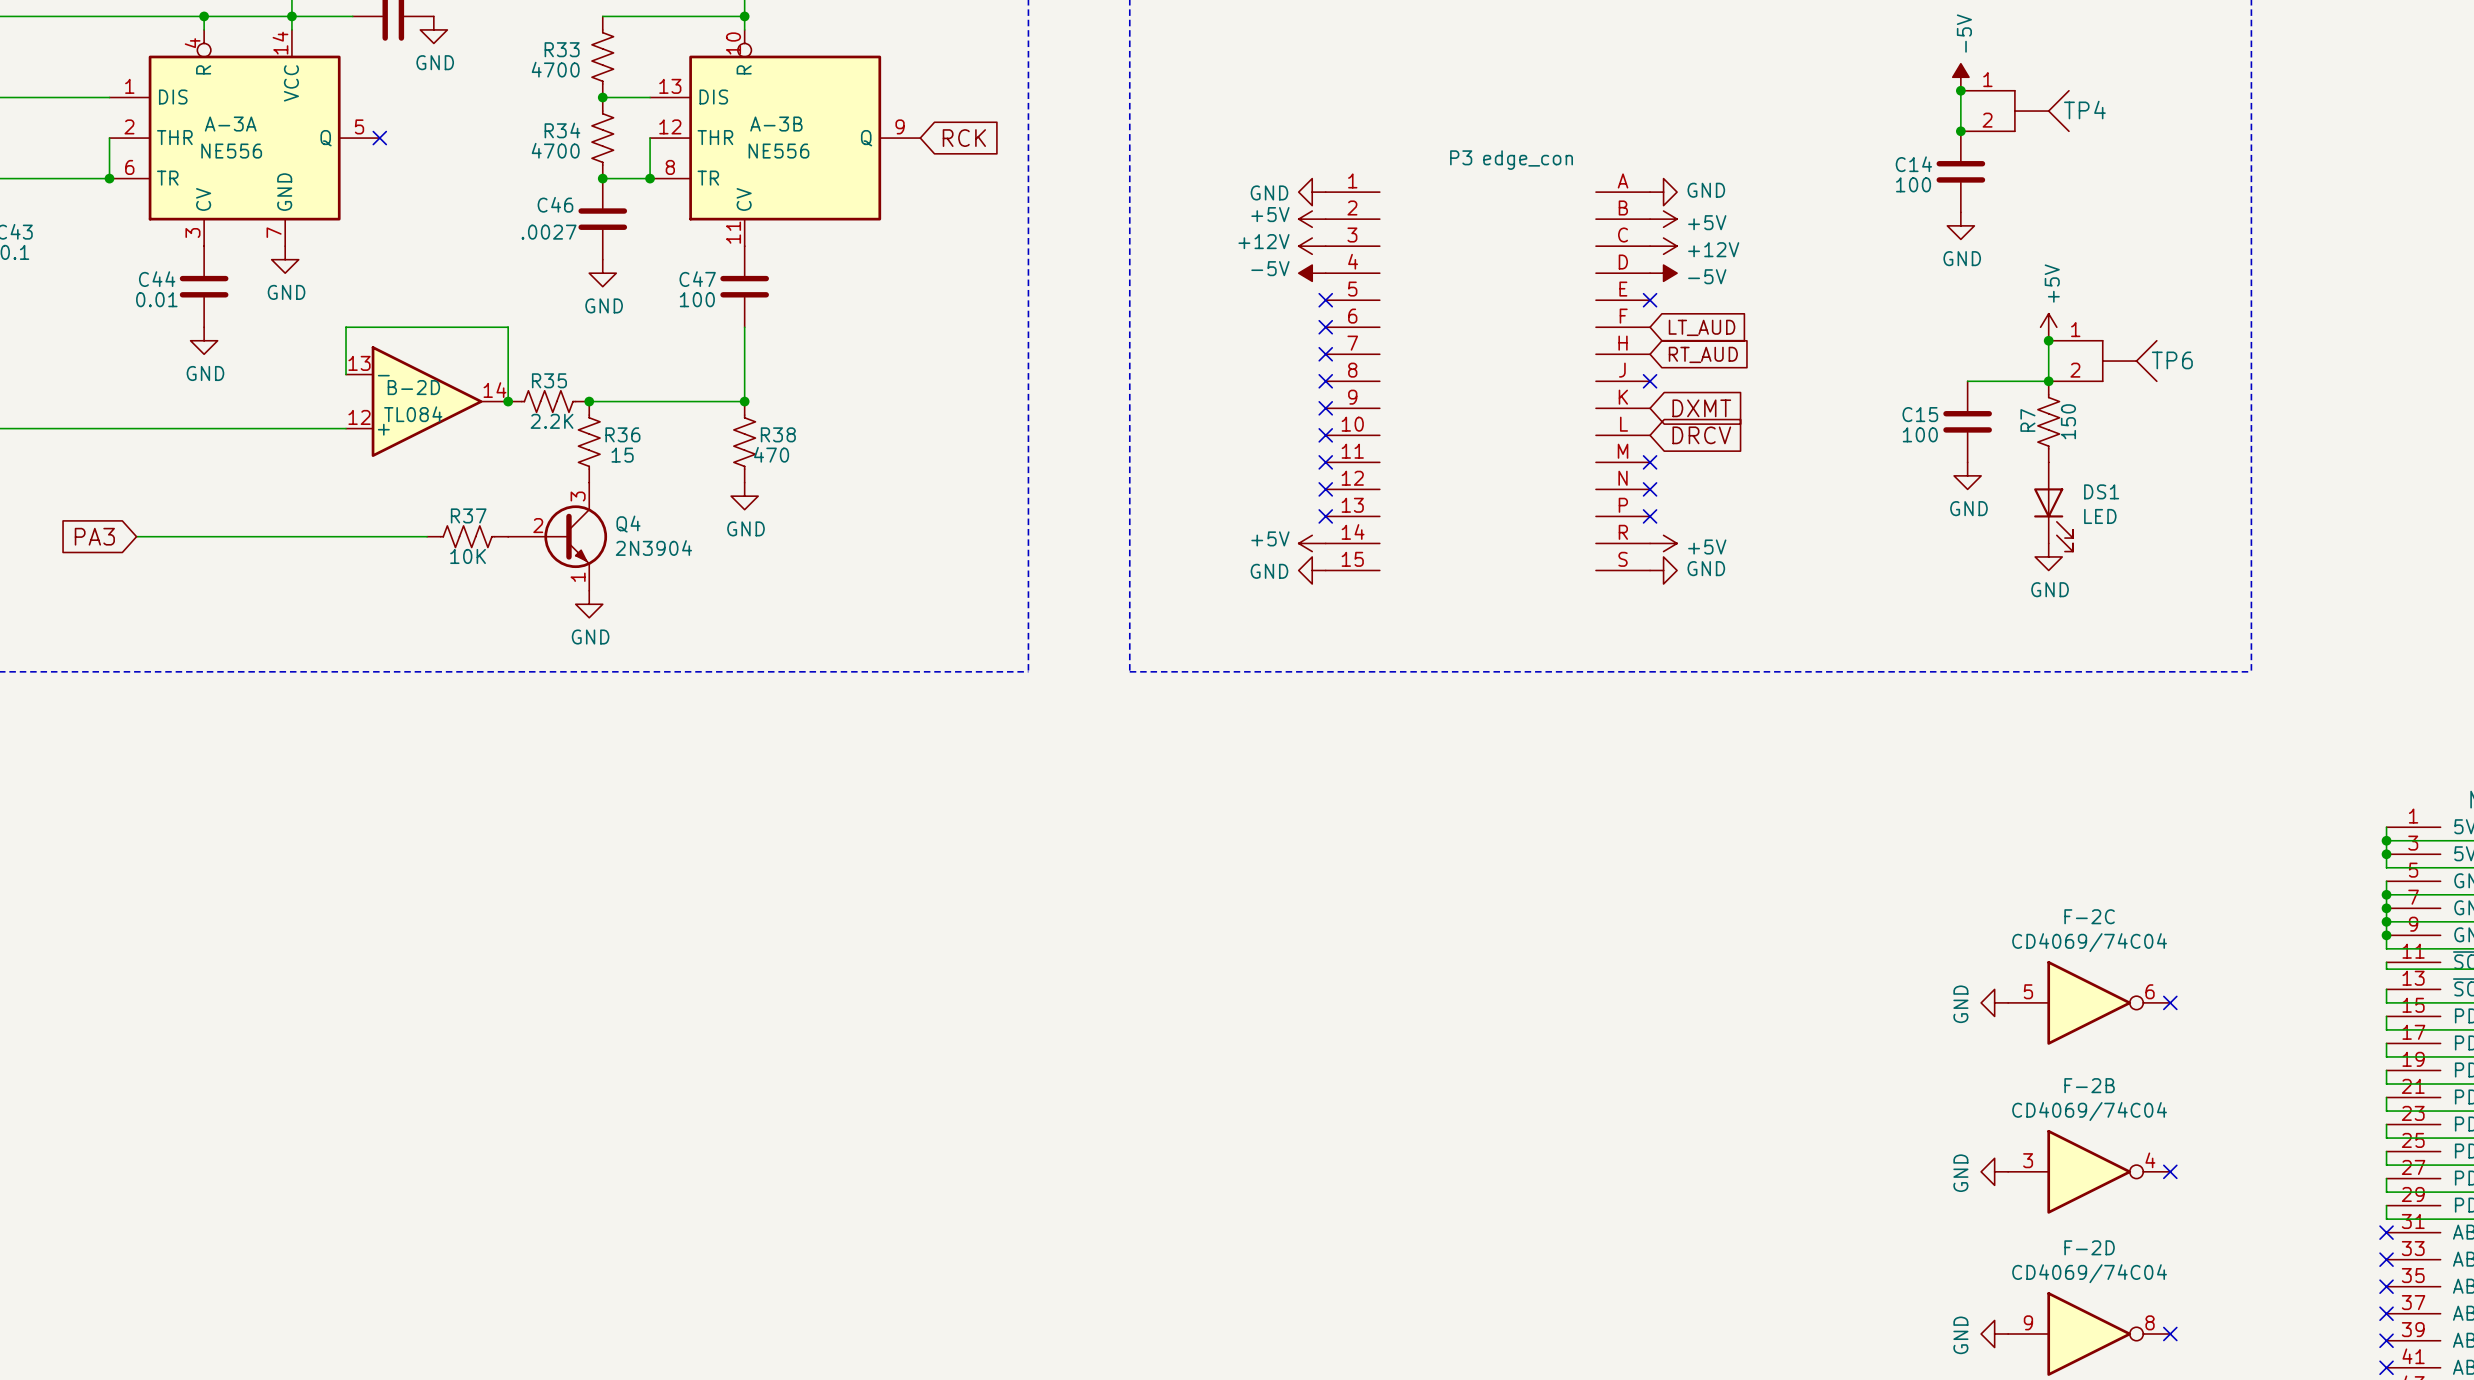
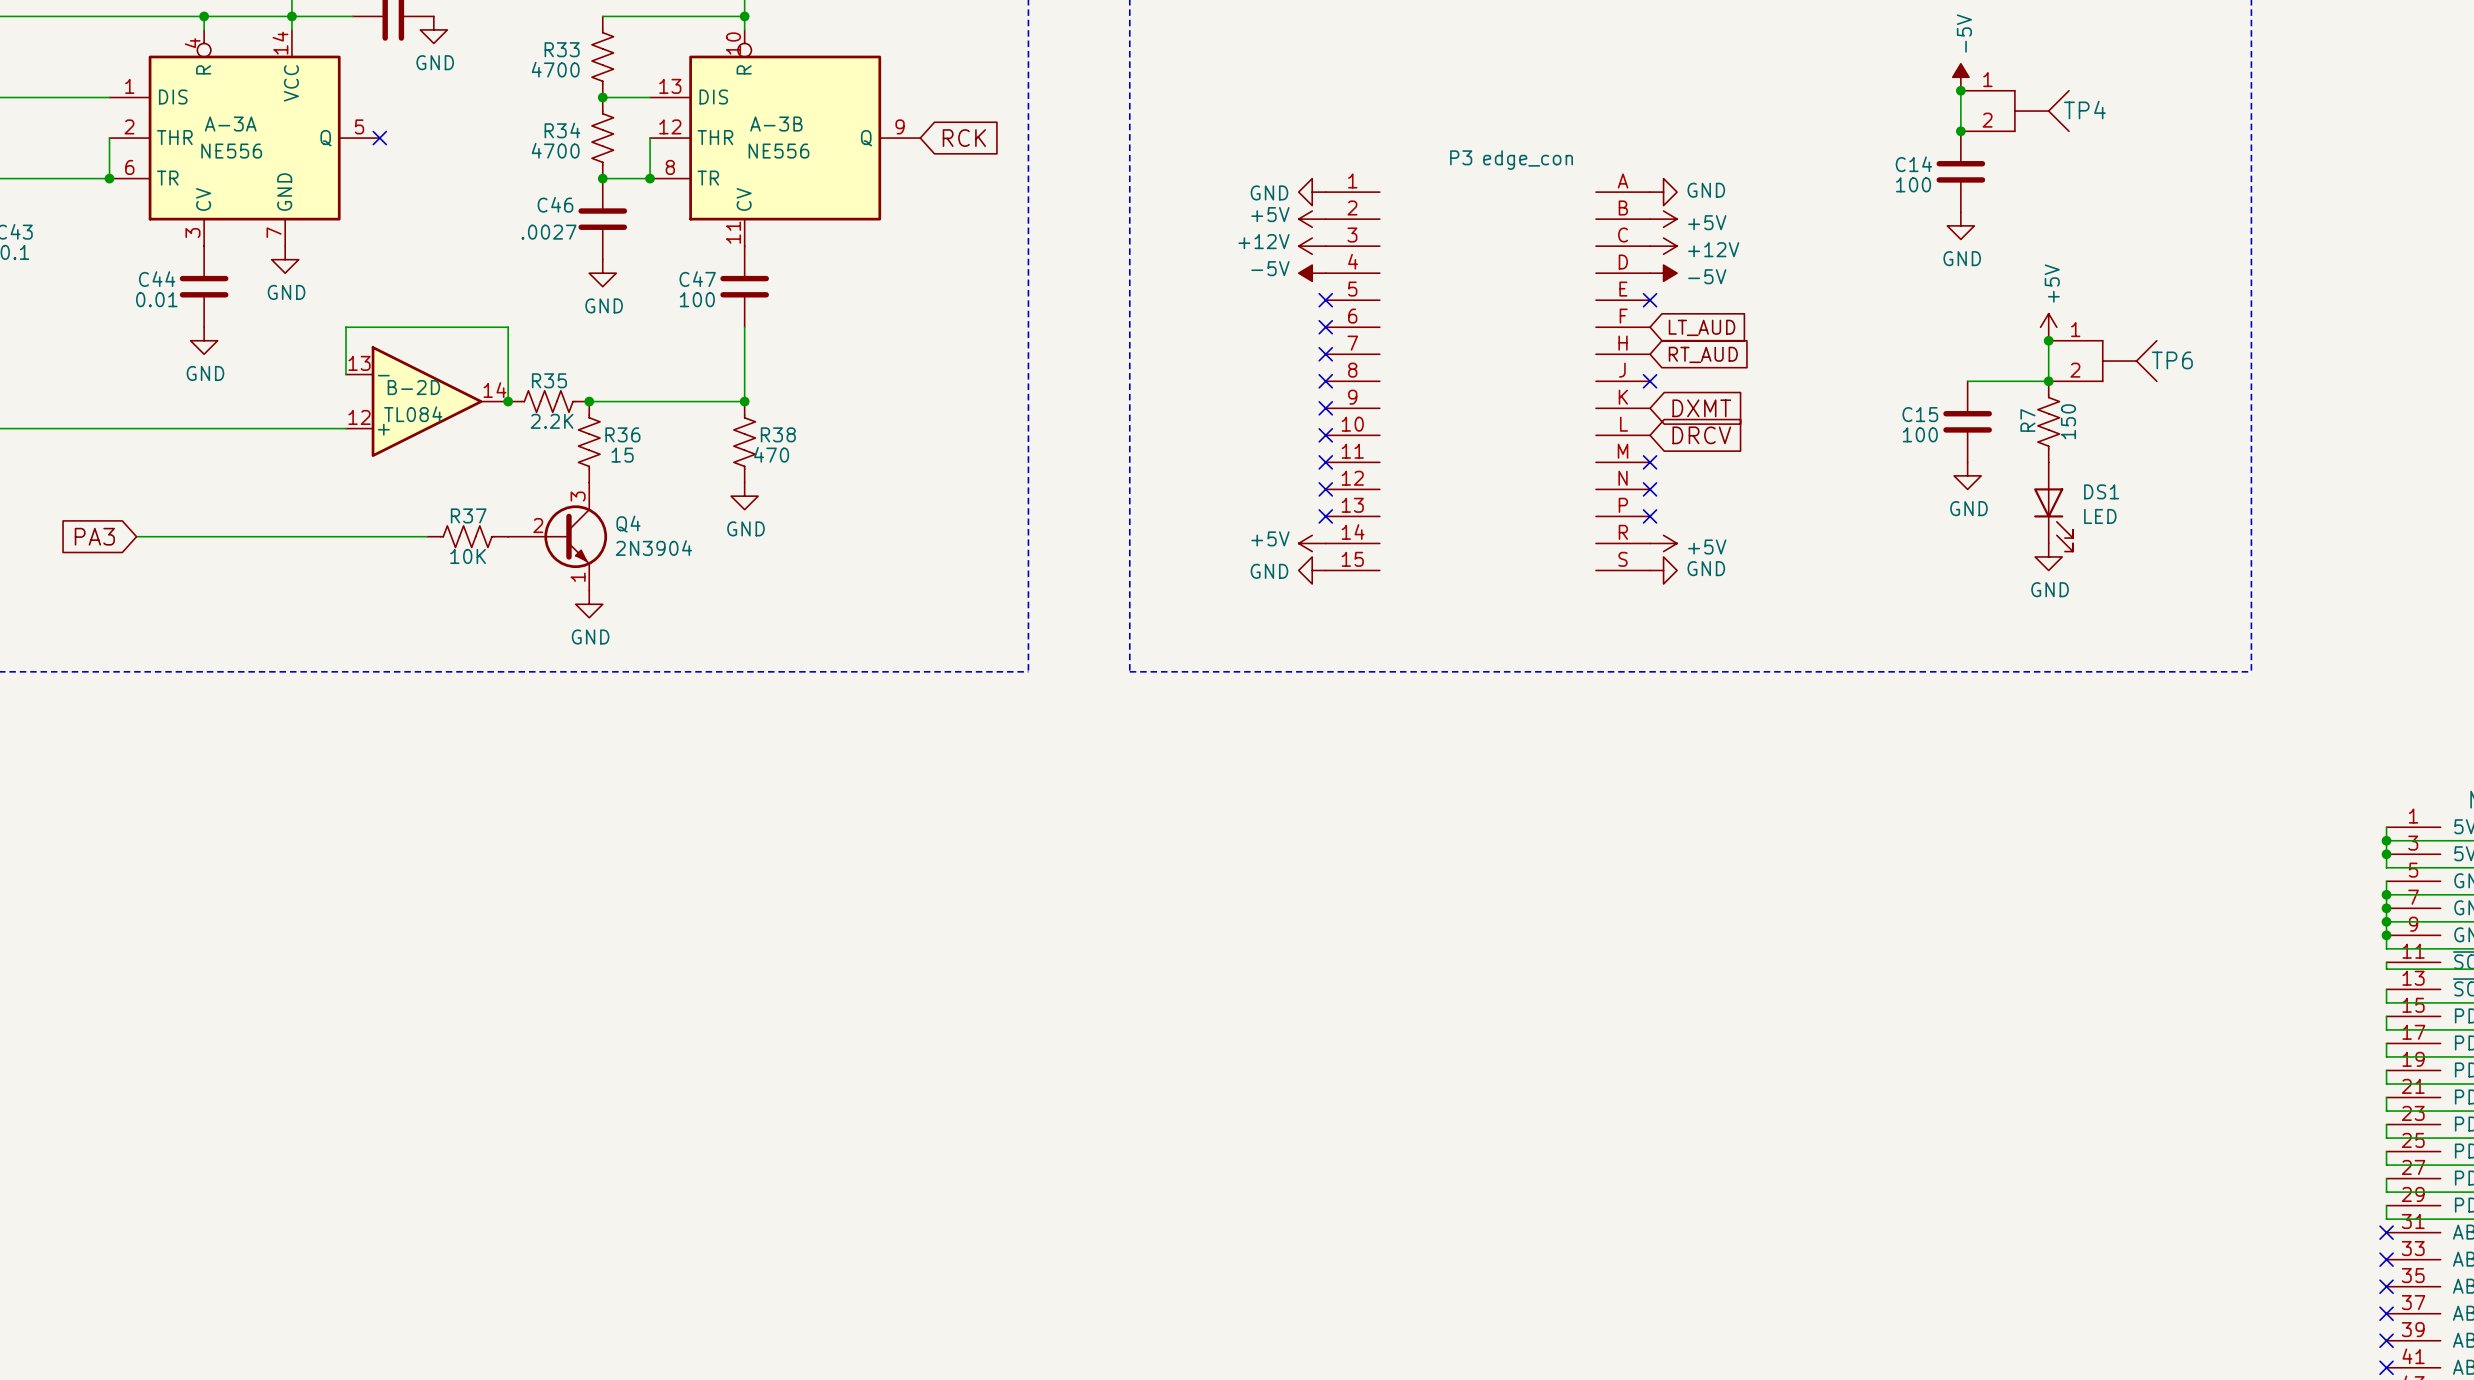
power symbol: GND (1994, 1002) -> none
F-2C: CD4069/74C04 (2089, 1002) -> none
no-connect mark: (2170, 1002) -> none
power symbol: GND (1994, 1171) -> none
F-2B: CD4069/74C04 (2089, 1171) -> none
no-connect mark: (2170, 1171) -> none
power symbol: GND (1994, 1333) -> none
F-2D: CD4069/74C04 (2089, 1333) -> none
no-connect mark: (2170, 1333) -> none

